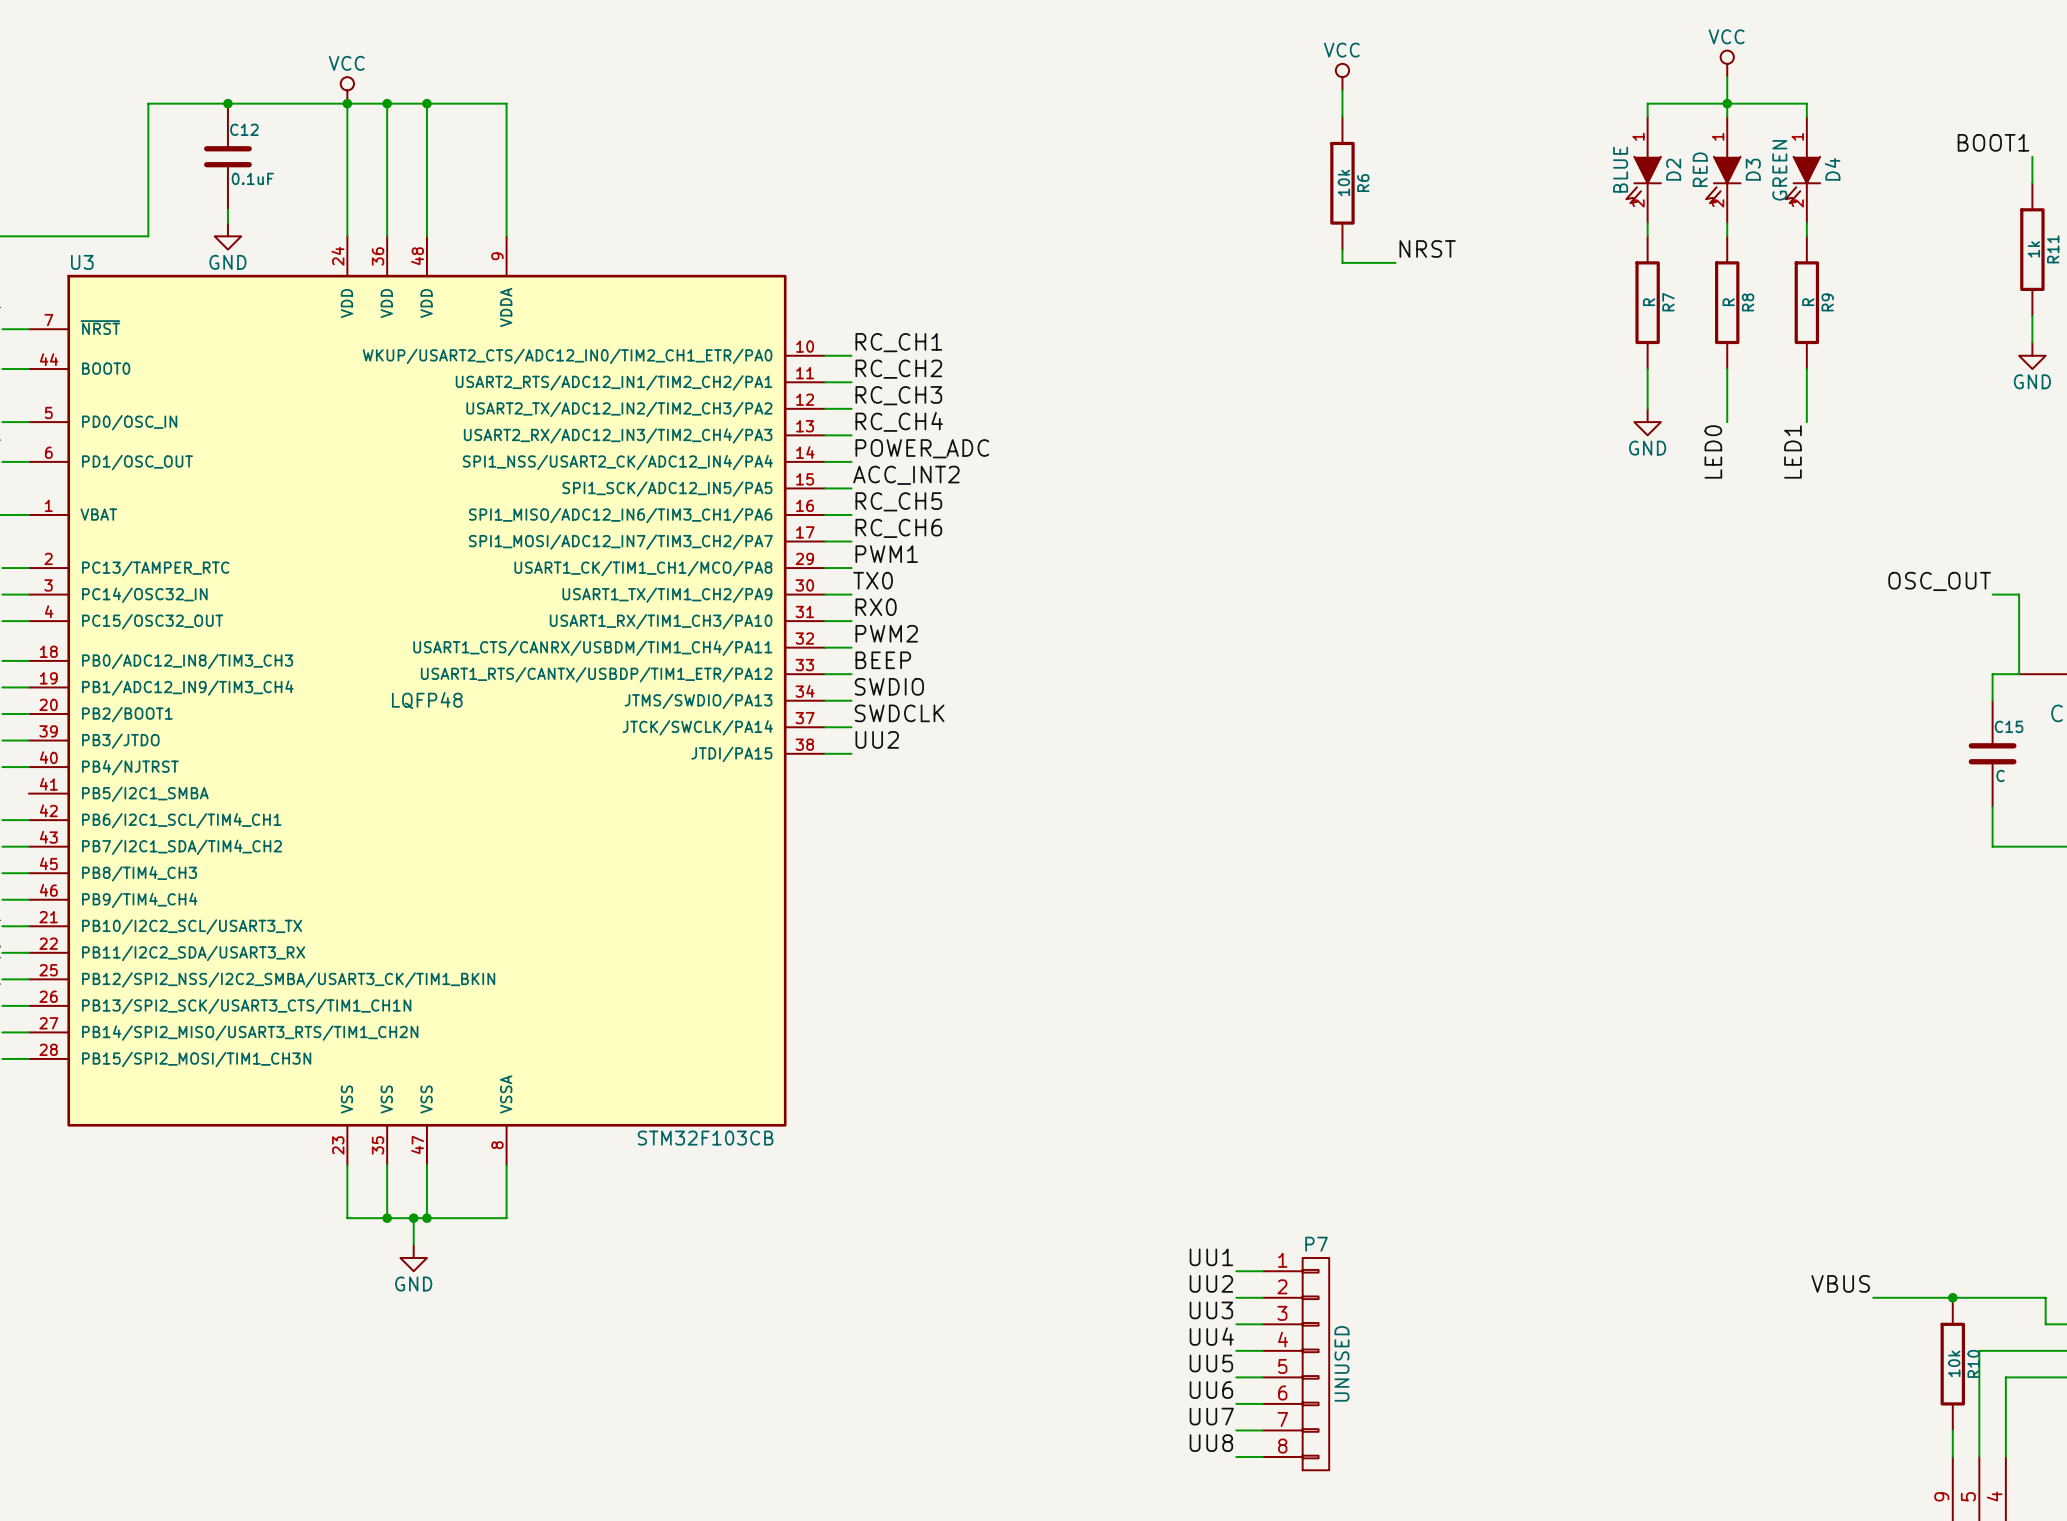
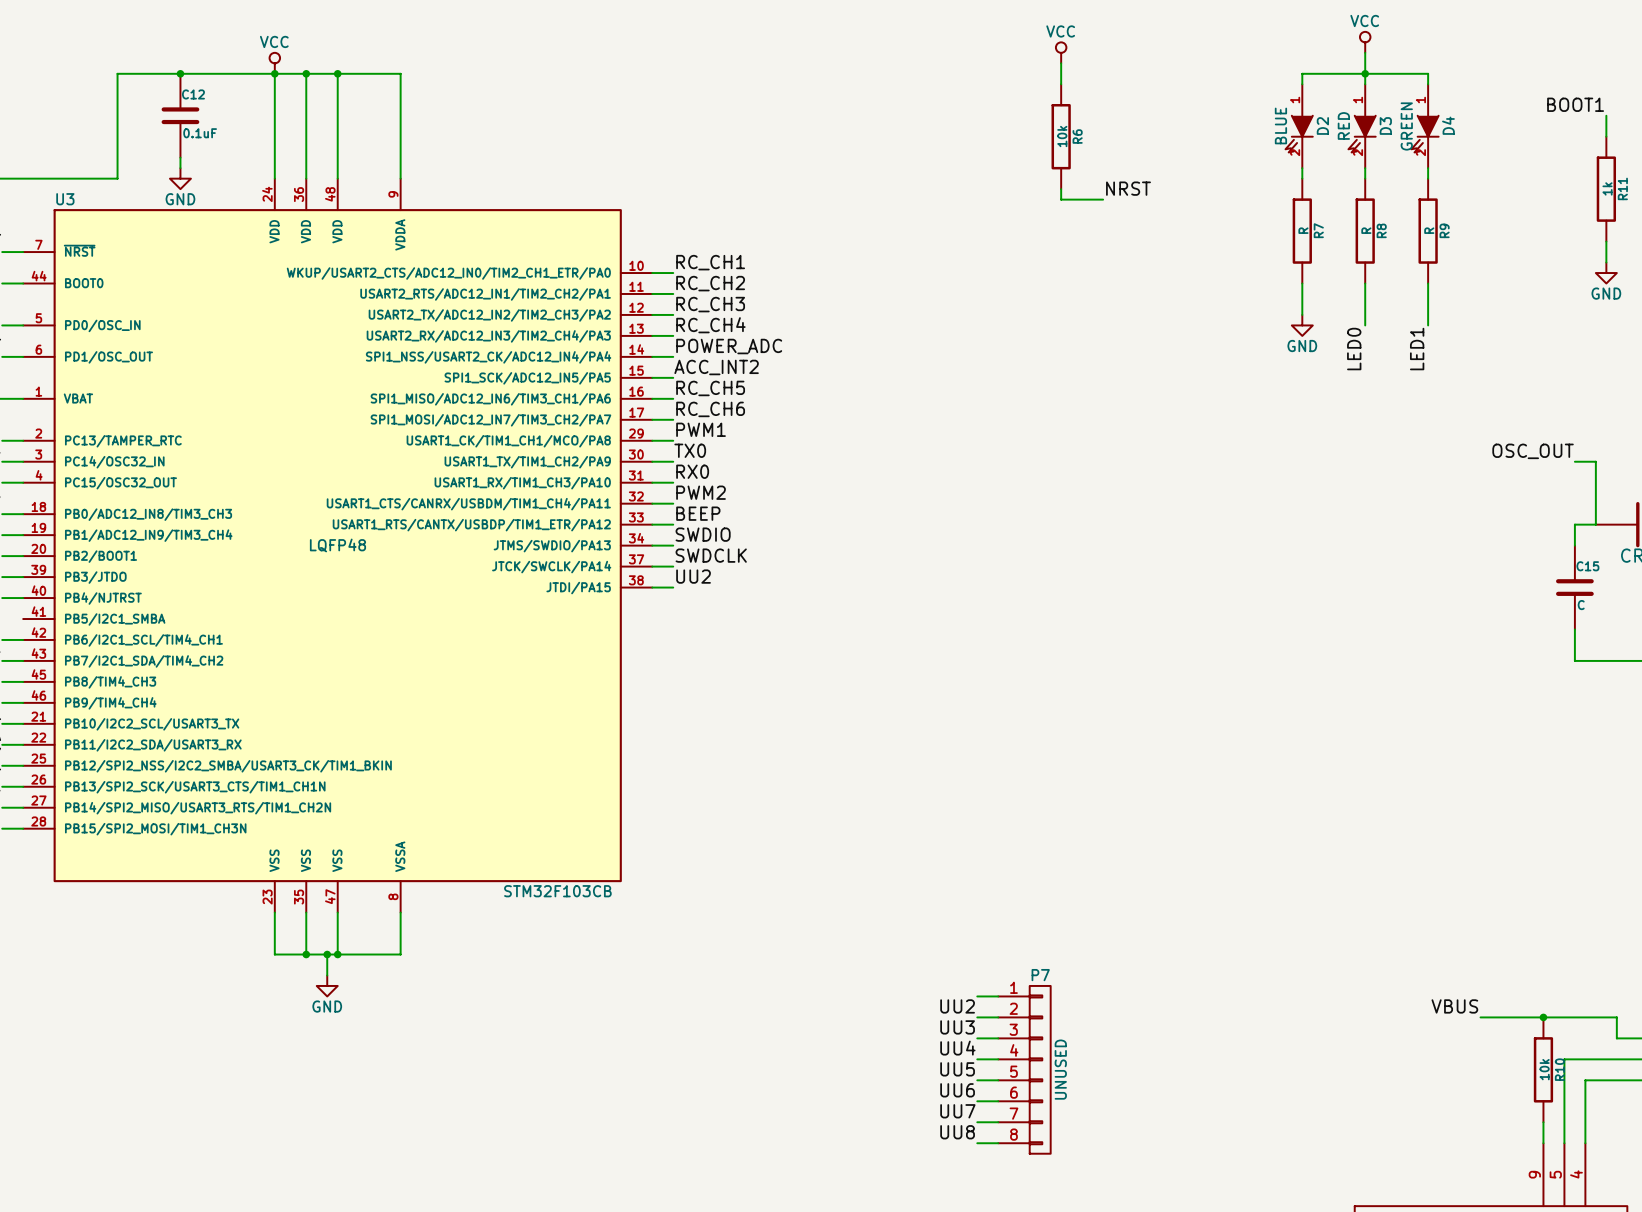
label: UU1 (1211, 1257) -> none

